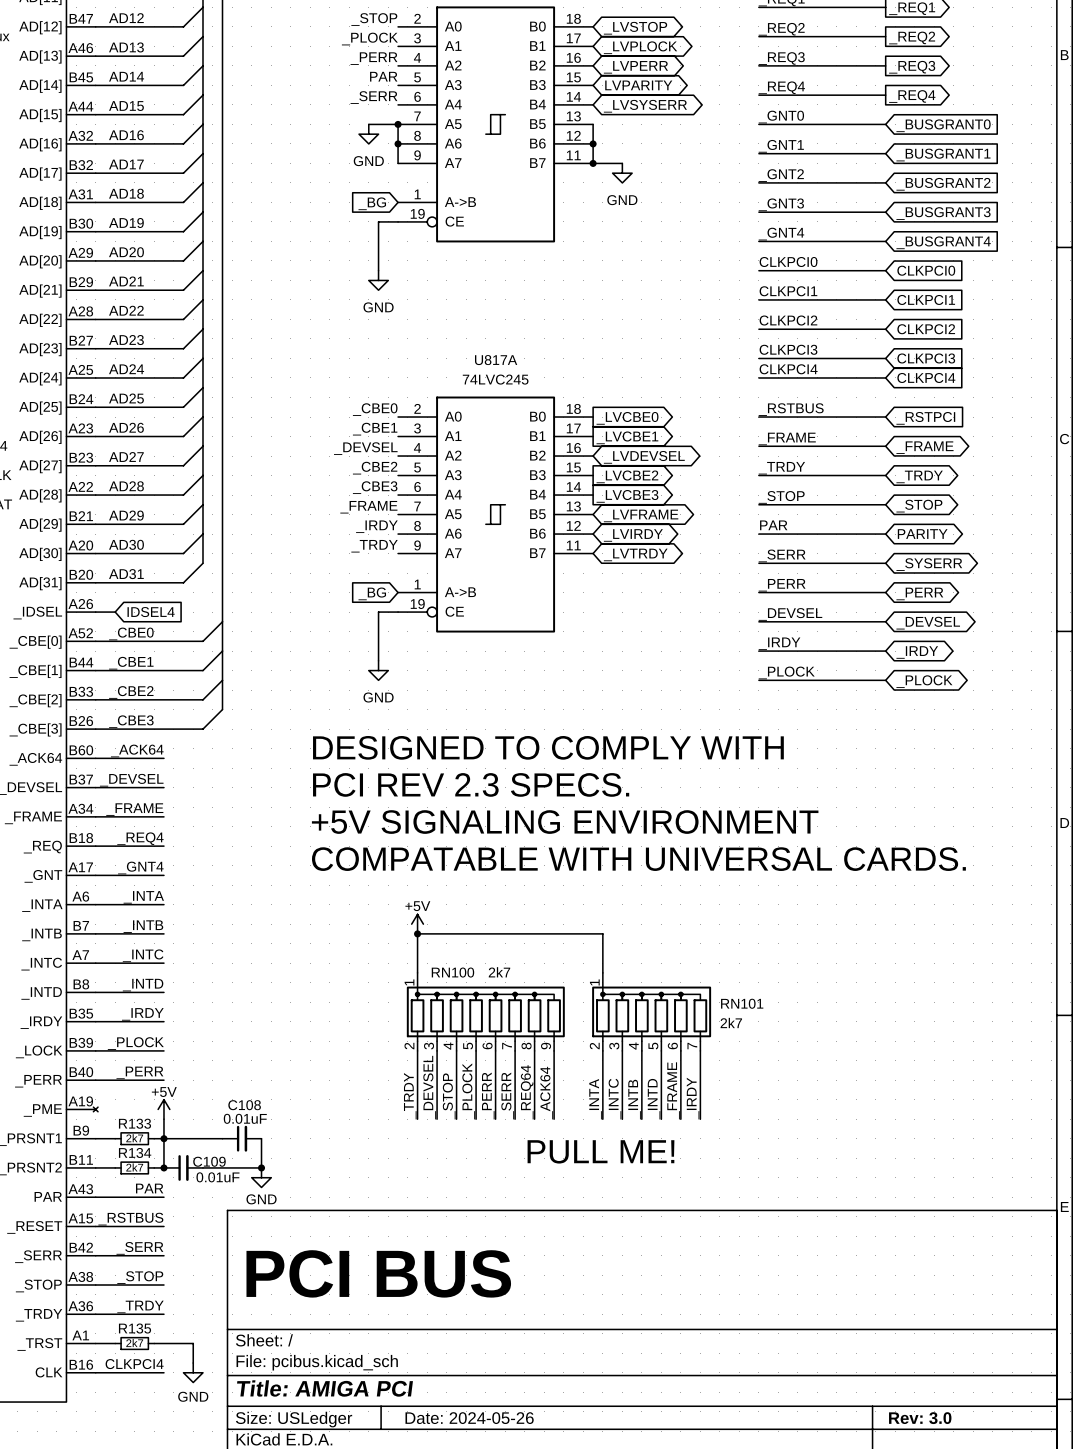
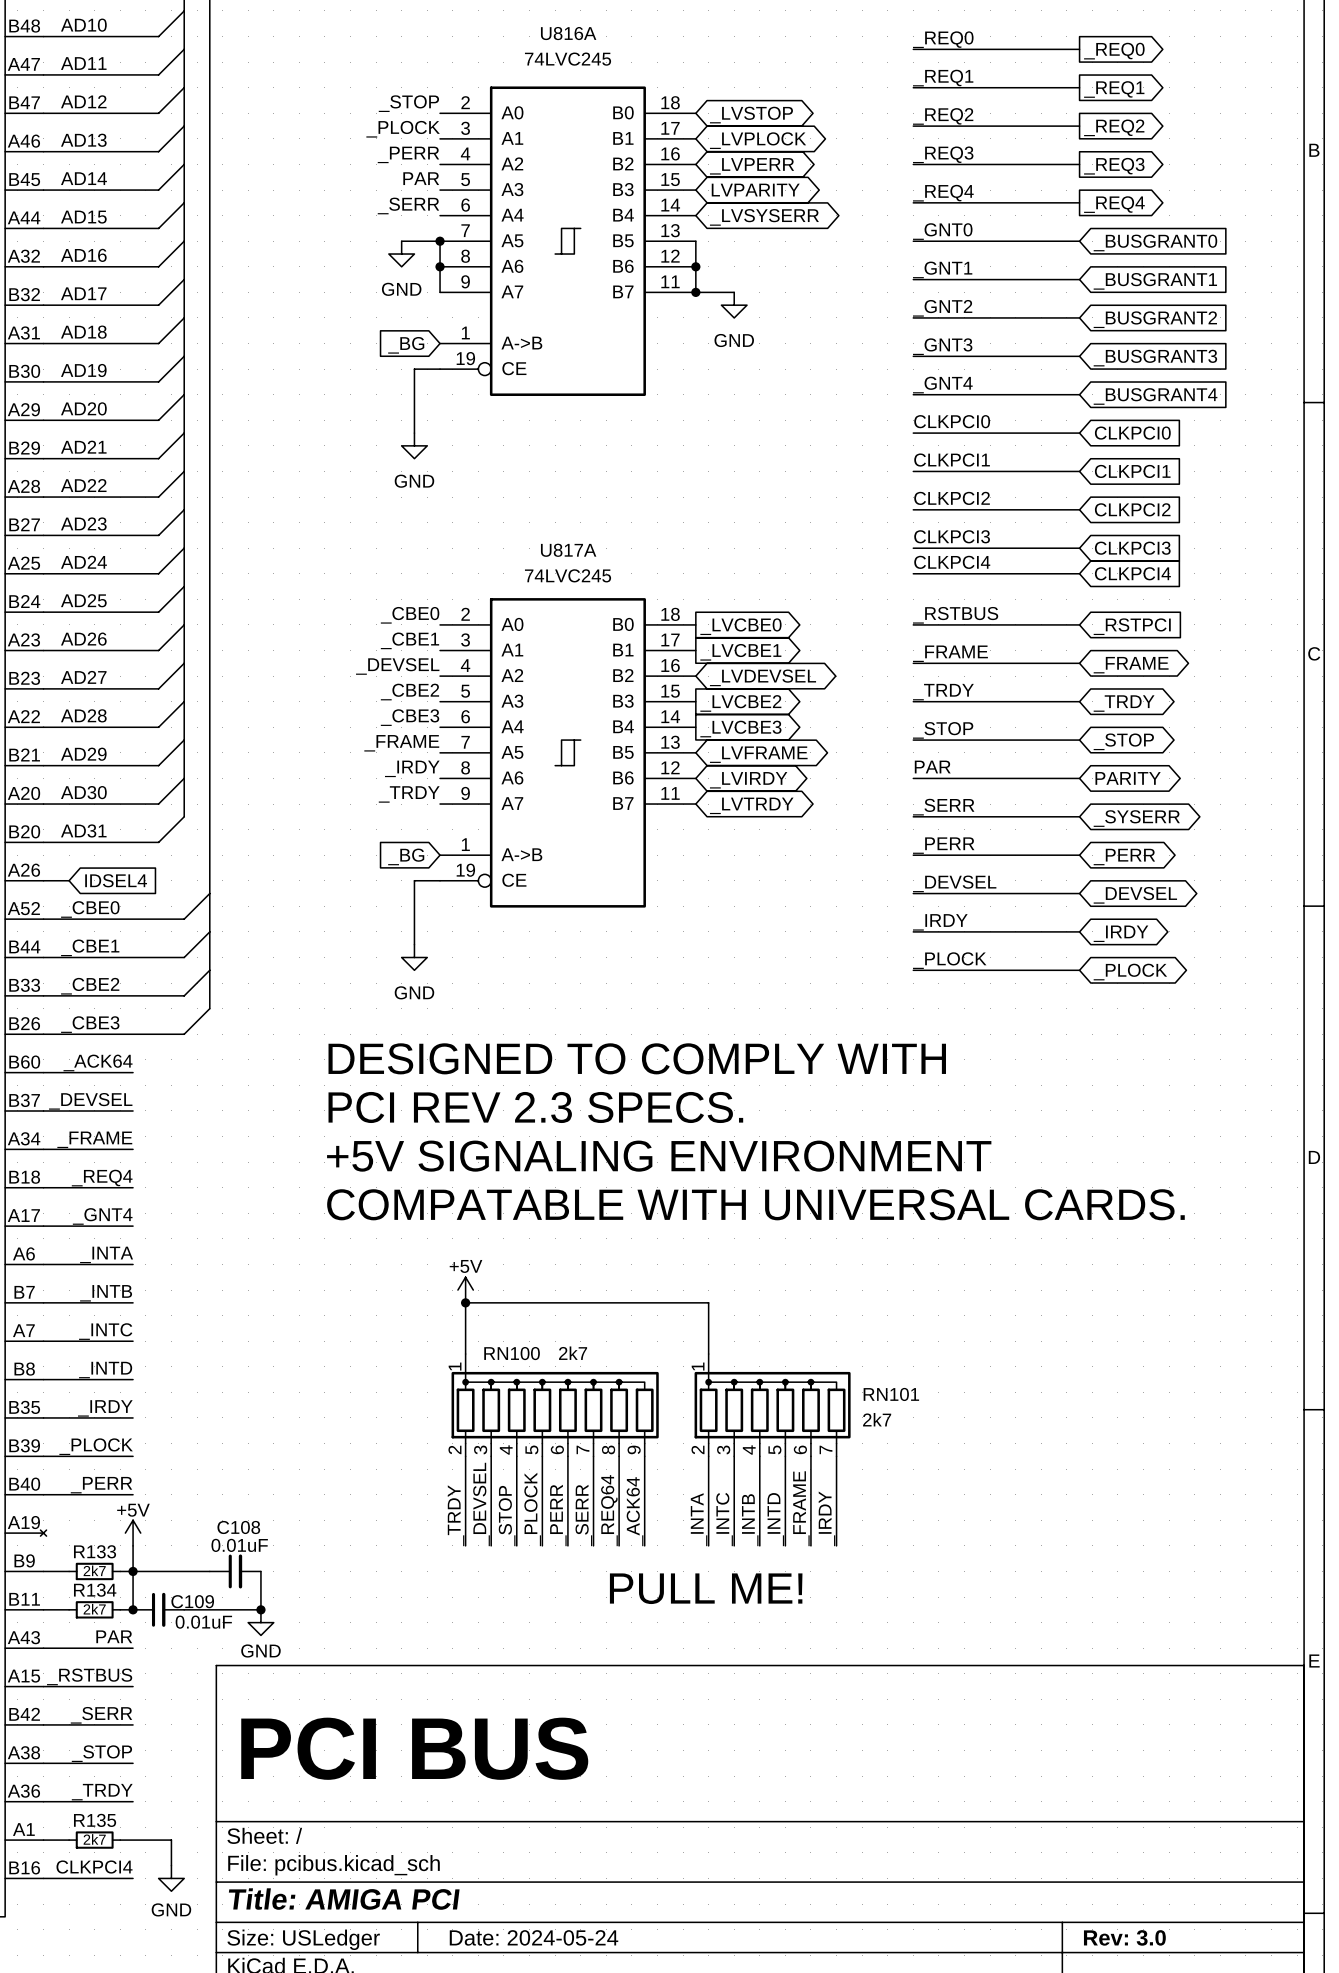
title block: Date: 2024-05-26 (469, 1418) -> Date: 2024-05-24 (534, 1937)

